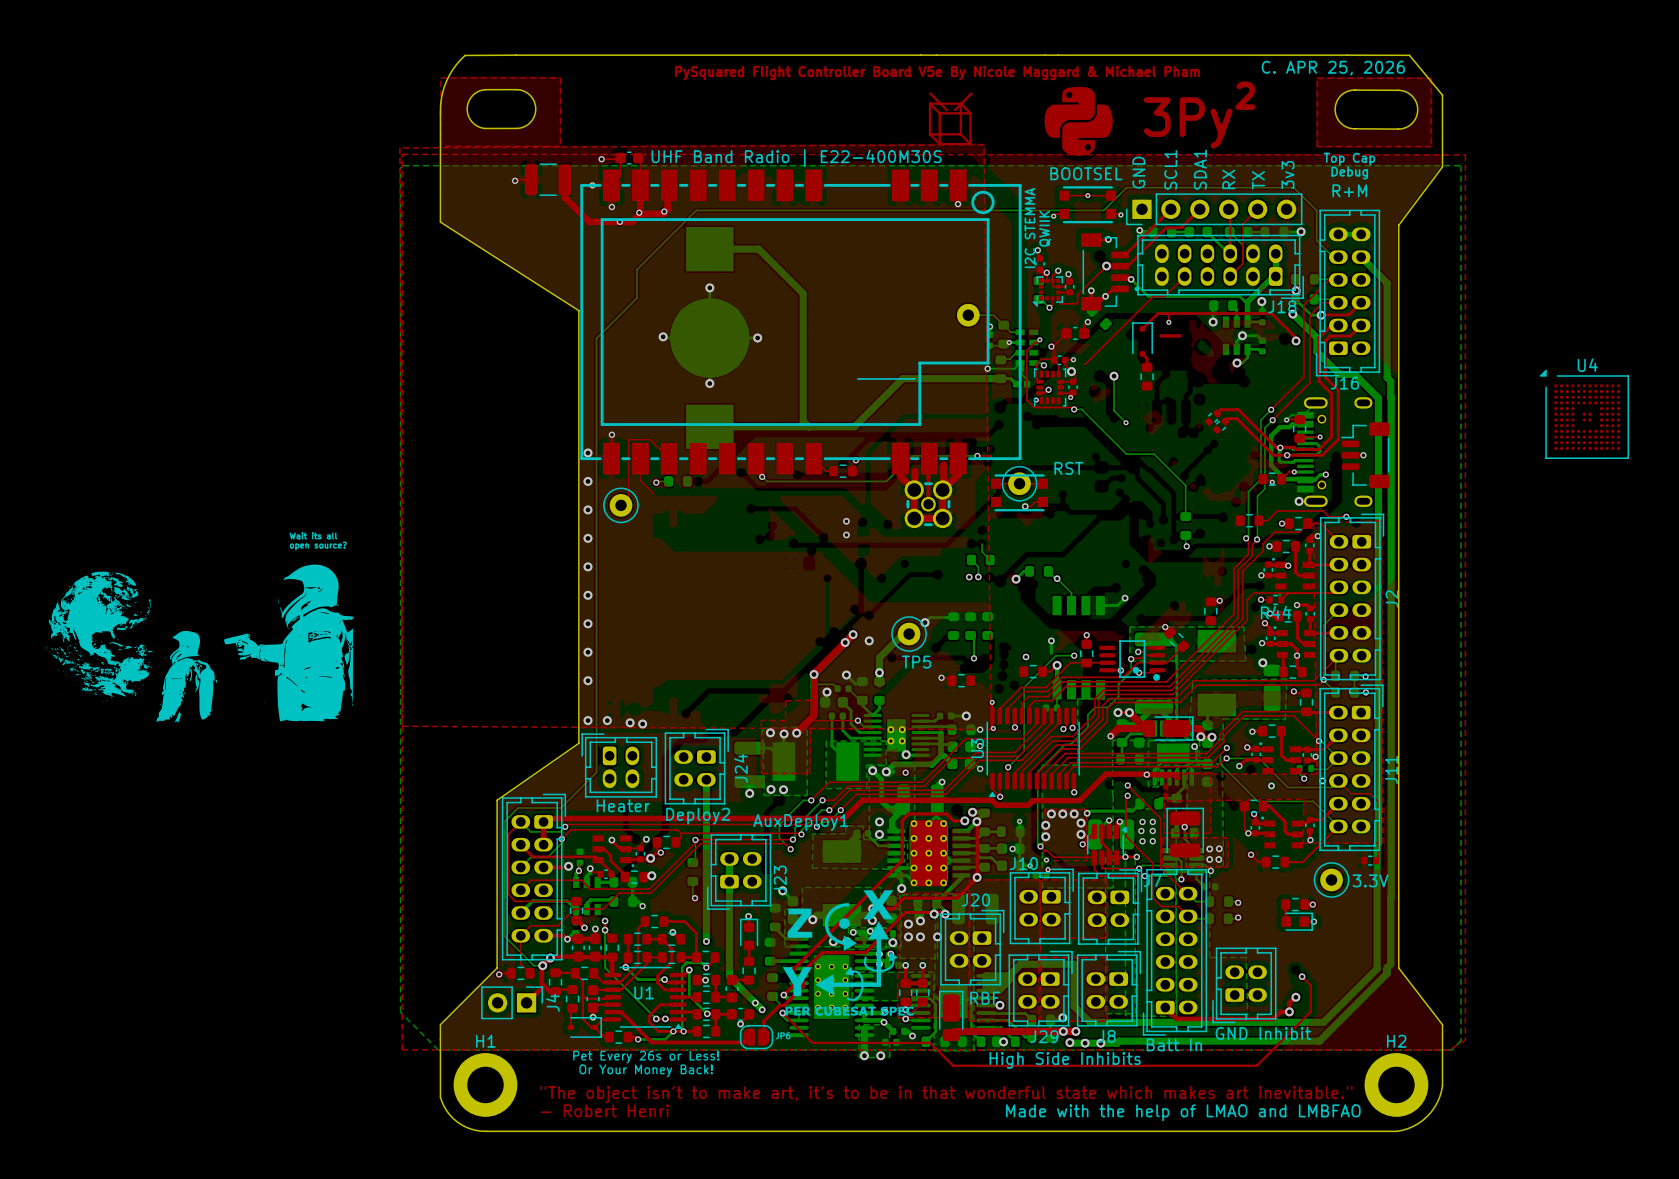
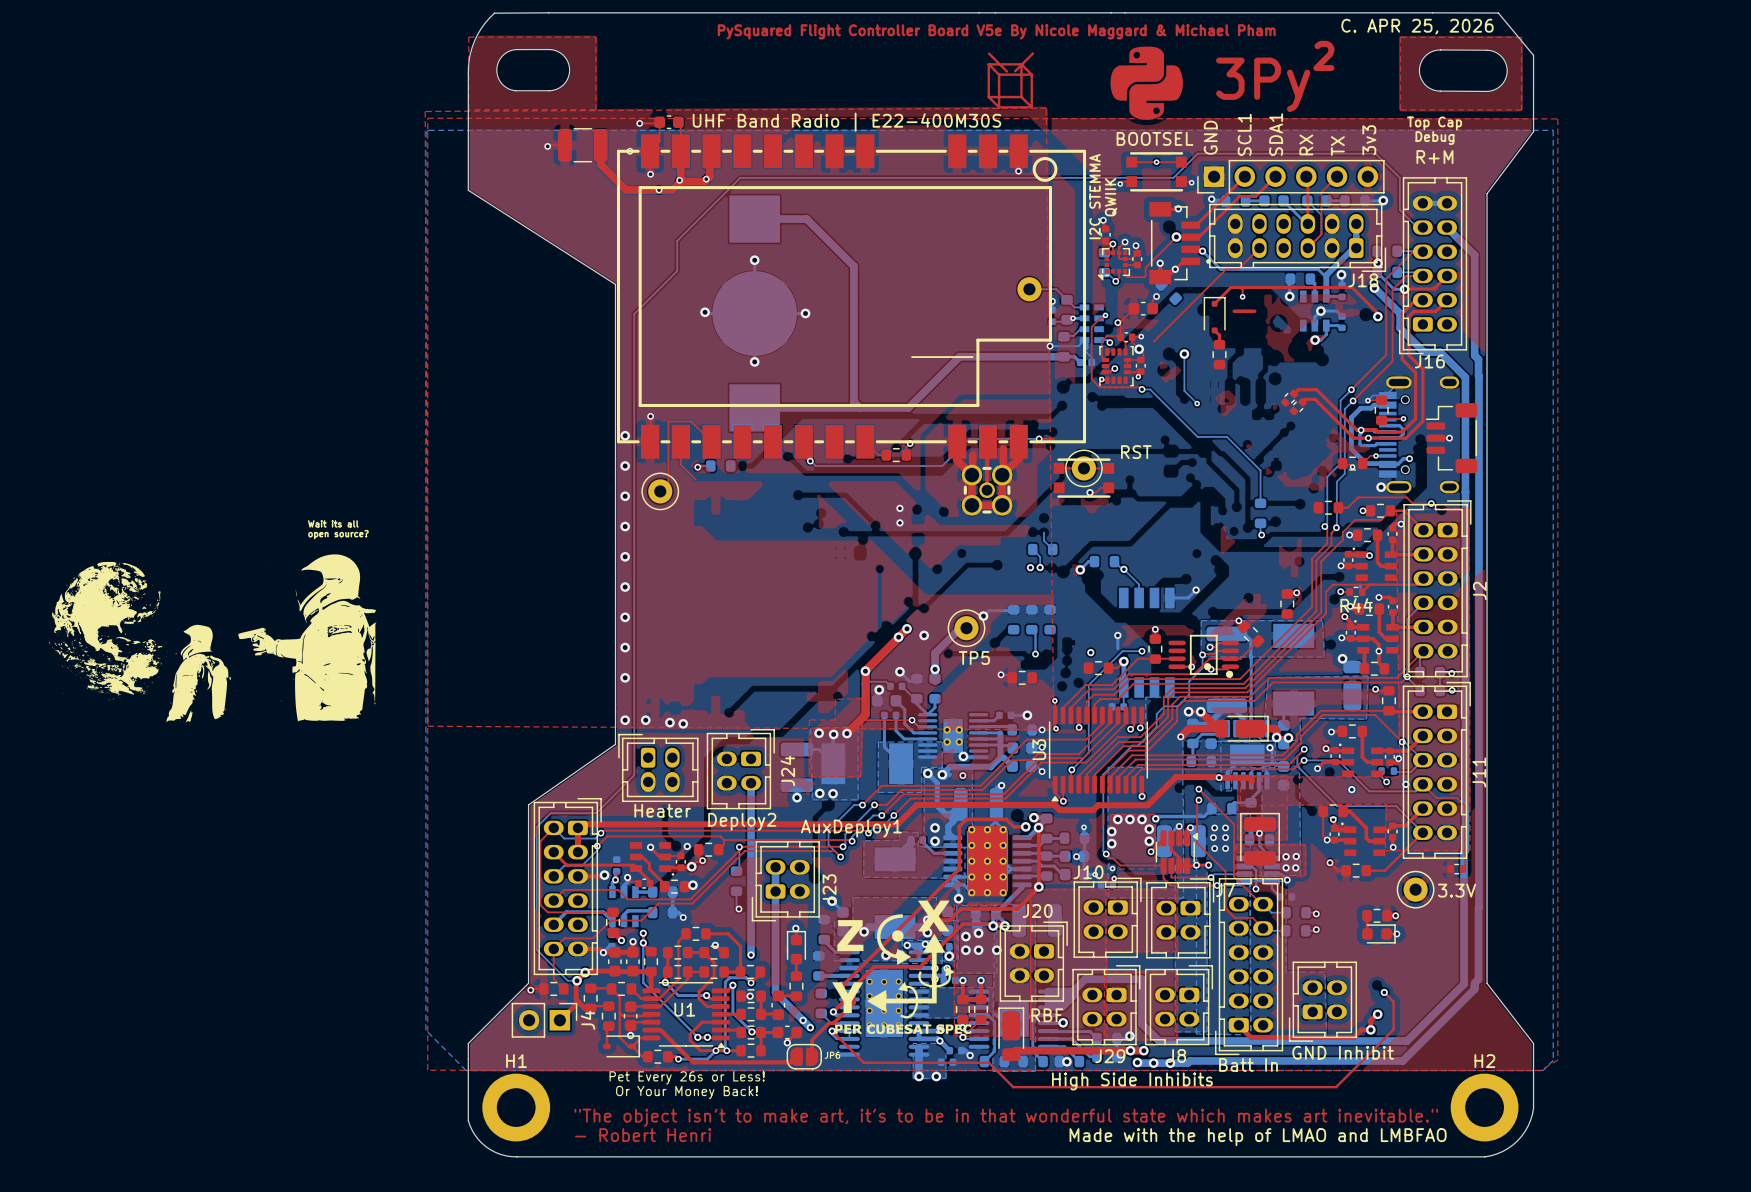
U4: (1584, 414) -> none

